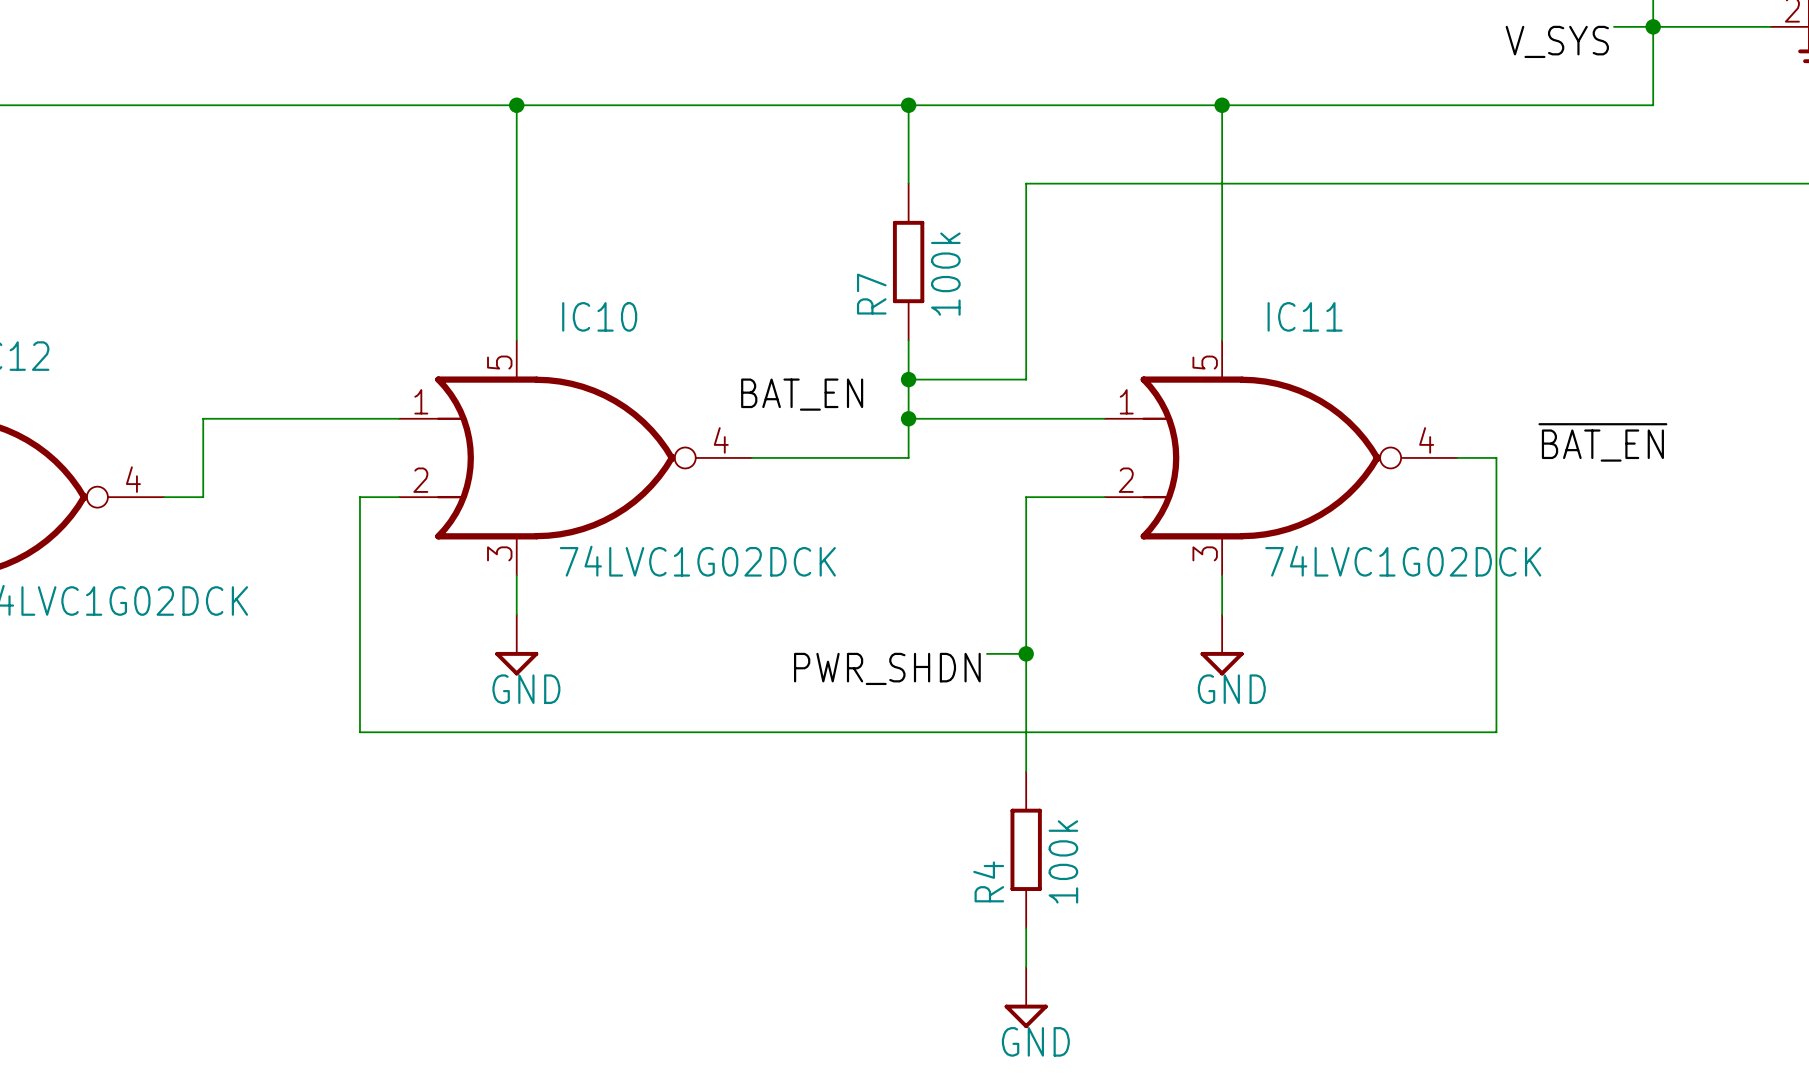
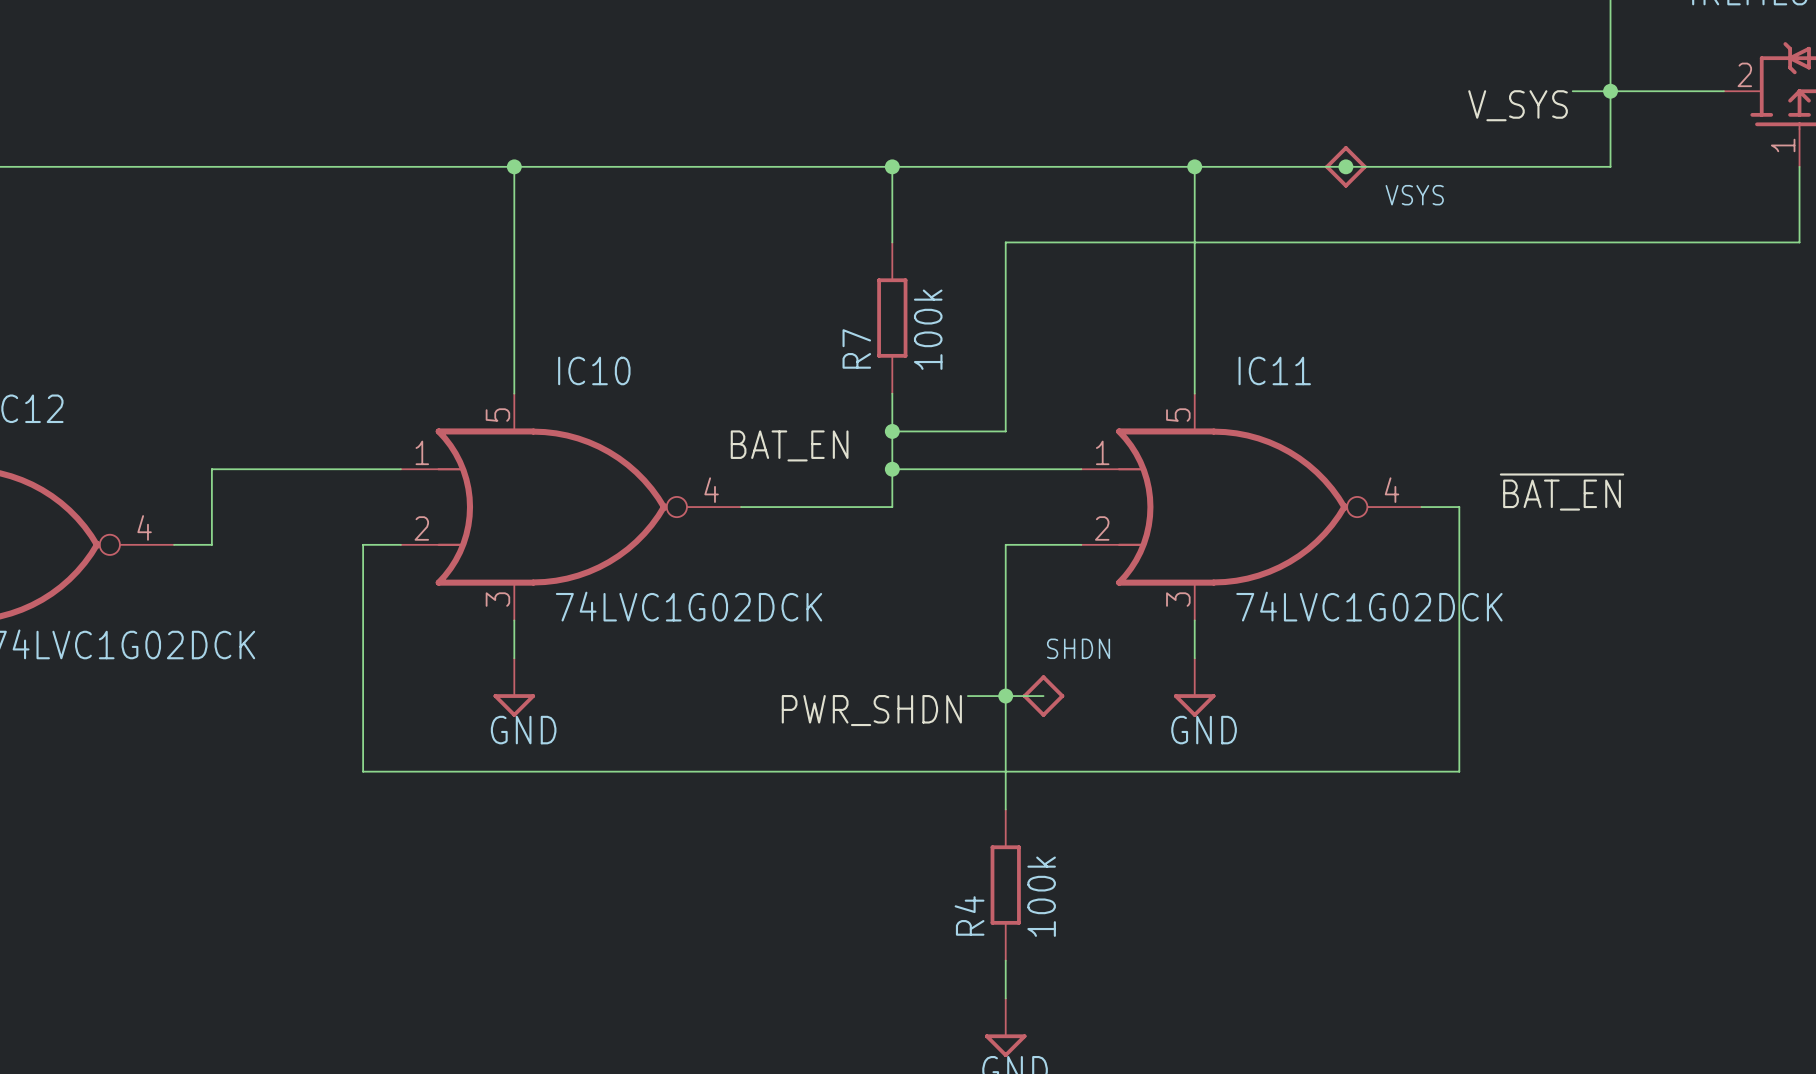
junction: none -> (1345, 166)
part: none -> VSYS (1345, 166)
wire: none -> (1005, 696) (1043, 696)
part: none -> SHDN (1043, 696)

